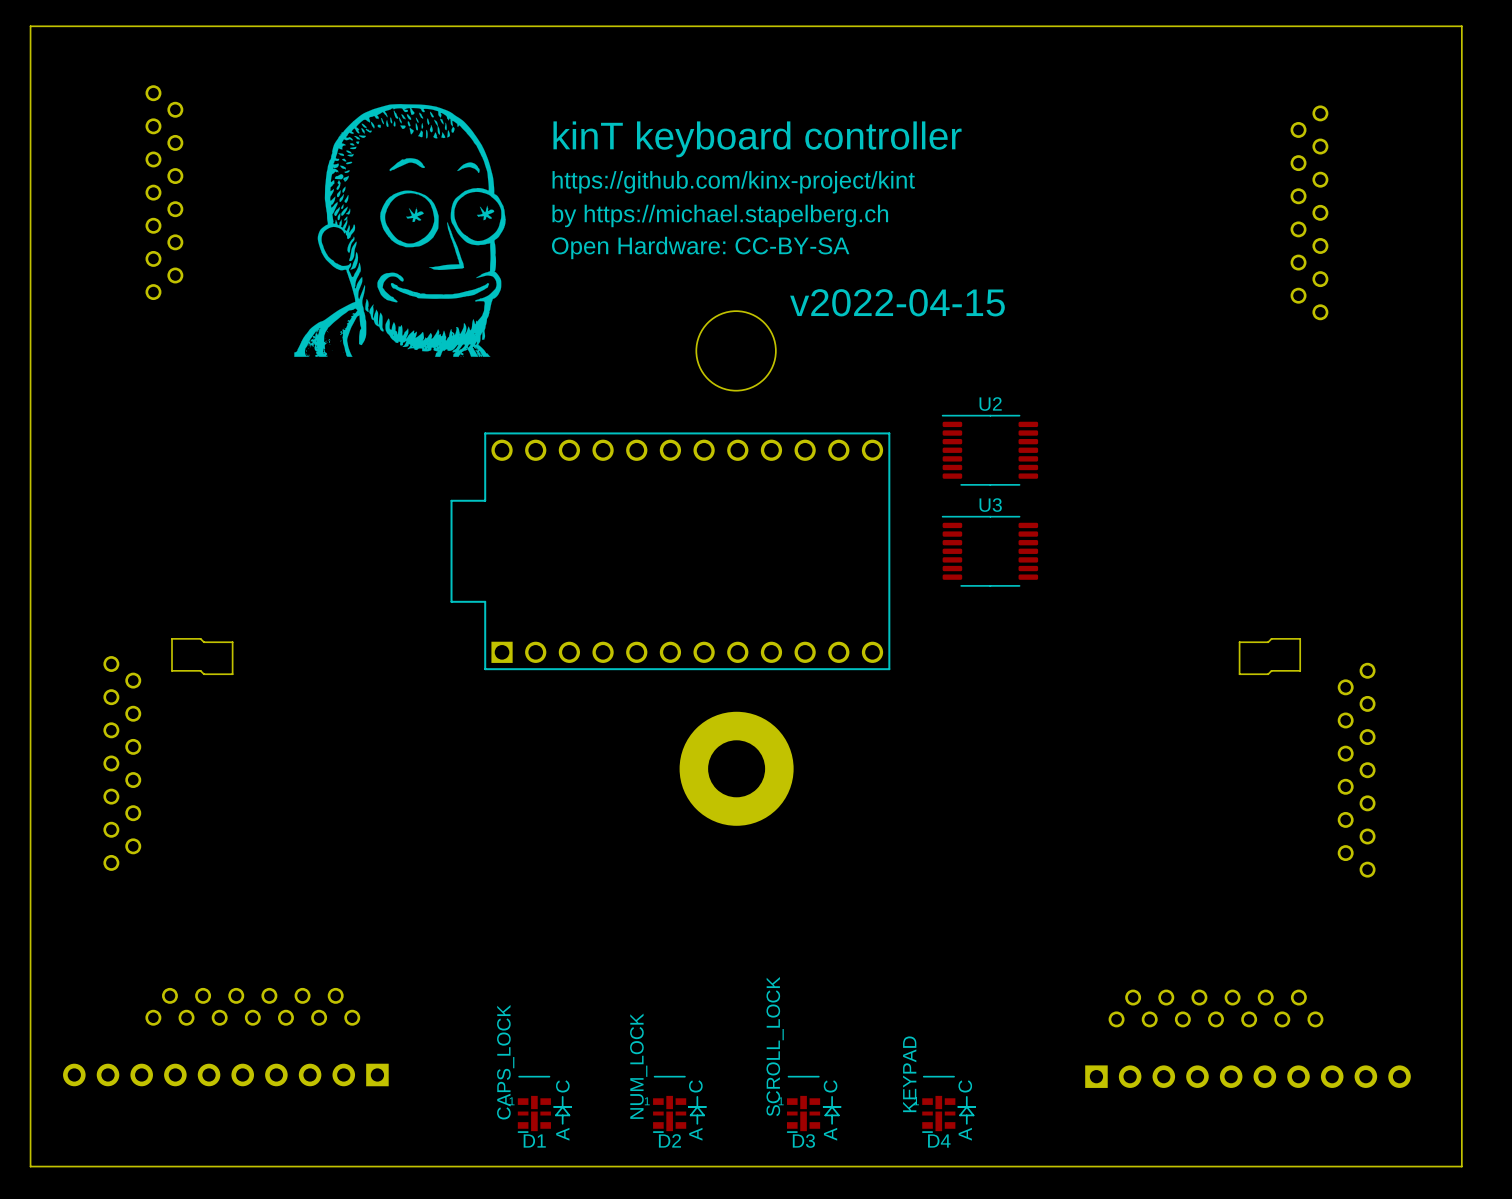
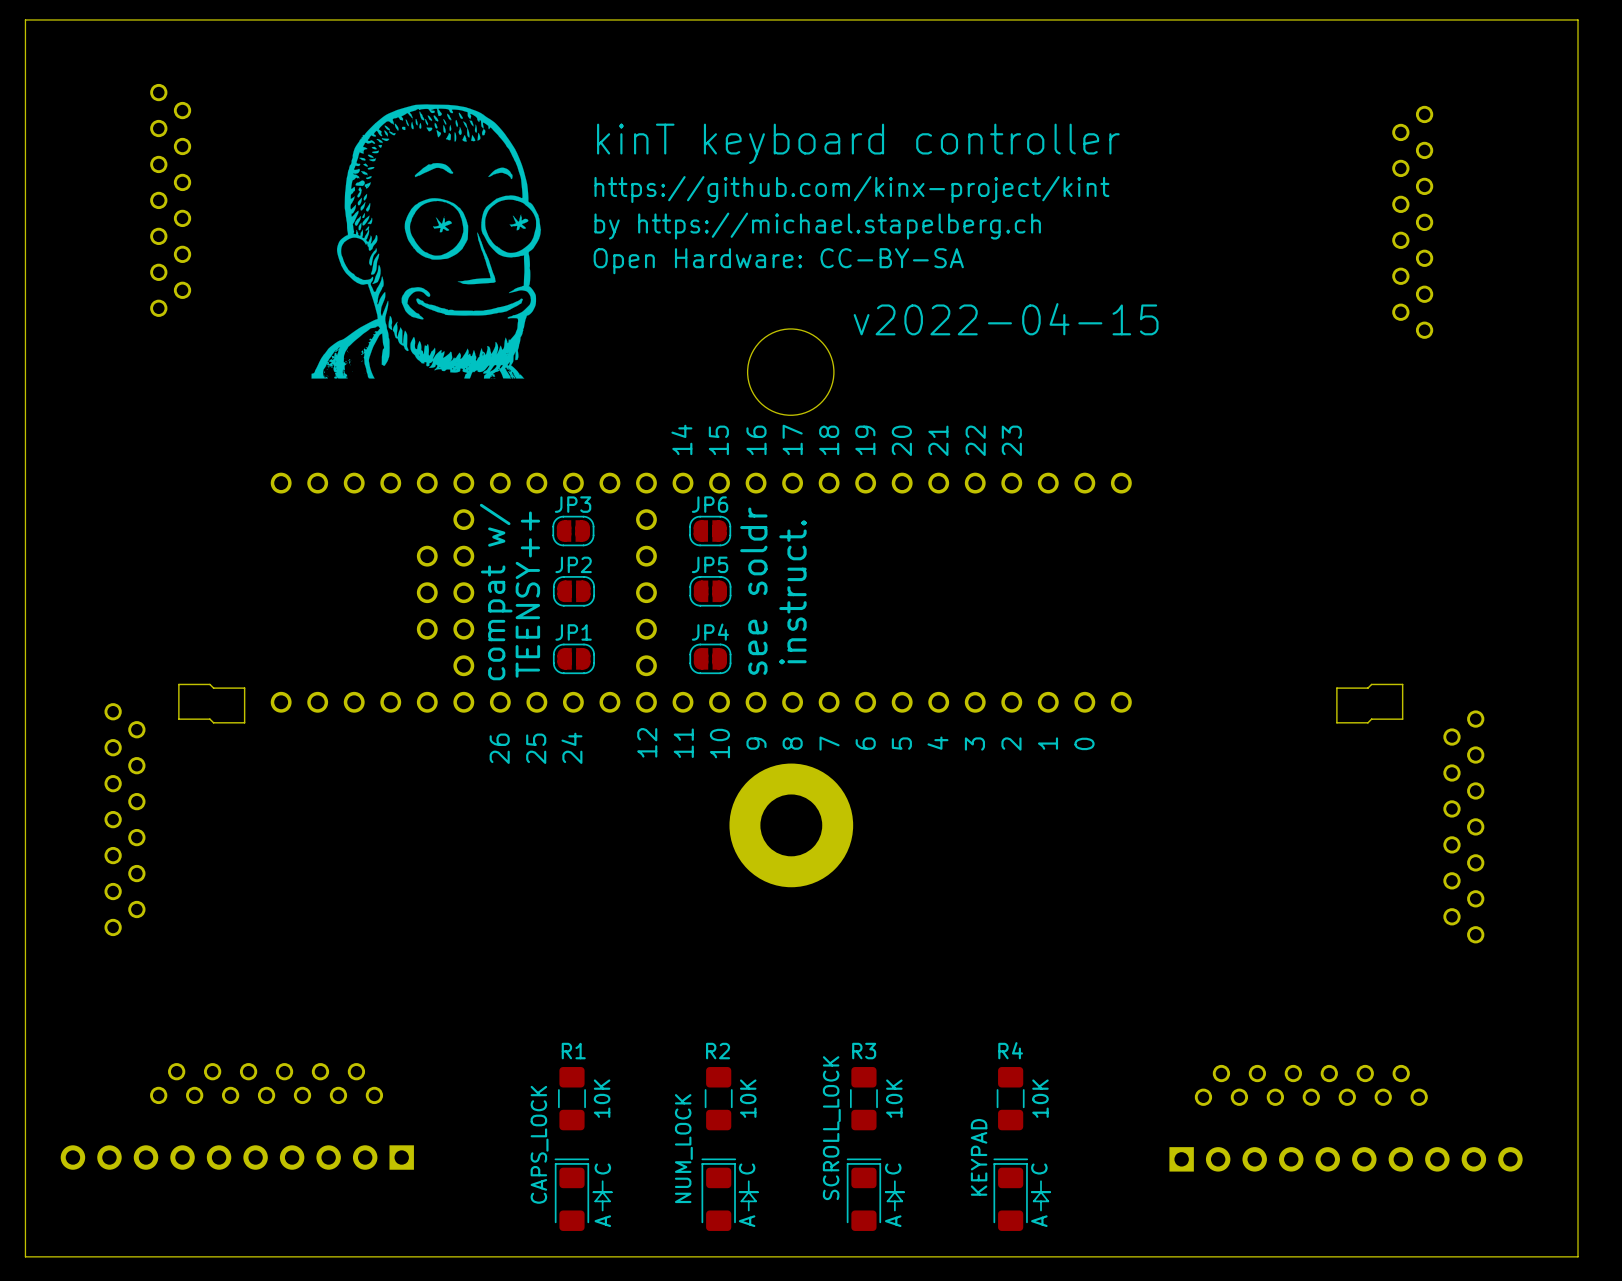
U2: (989, 450) -> none
JP3: none -> (573, 531)
JP6: none -> (710, 531)
part: (670, 551) -> none
U3: (989, 551) -> none
JP2: none -> (573, 591)
JP5: none -> (710, 591)
part: none -> (701, 592)
JP1: none -> (573, 658)
JP4: none -> (710, 658)
R1: none -> 10K (571, 1098)
R2: none -> 10K (718, 1098)
R3: none -> 10K (863, 1098)
R4: none -> 10K (1010, 1098)
part: none -> (571, 1197)
part: none -> (718, 1197)
part: none -> (863, 1197)
part: none -> (1010, 1197)
D1: (534, 1114) -> none
D2: (669, 1114) -> none
D3: (803, 1114) -> none
D4: (938, 1114) -> none

